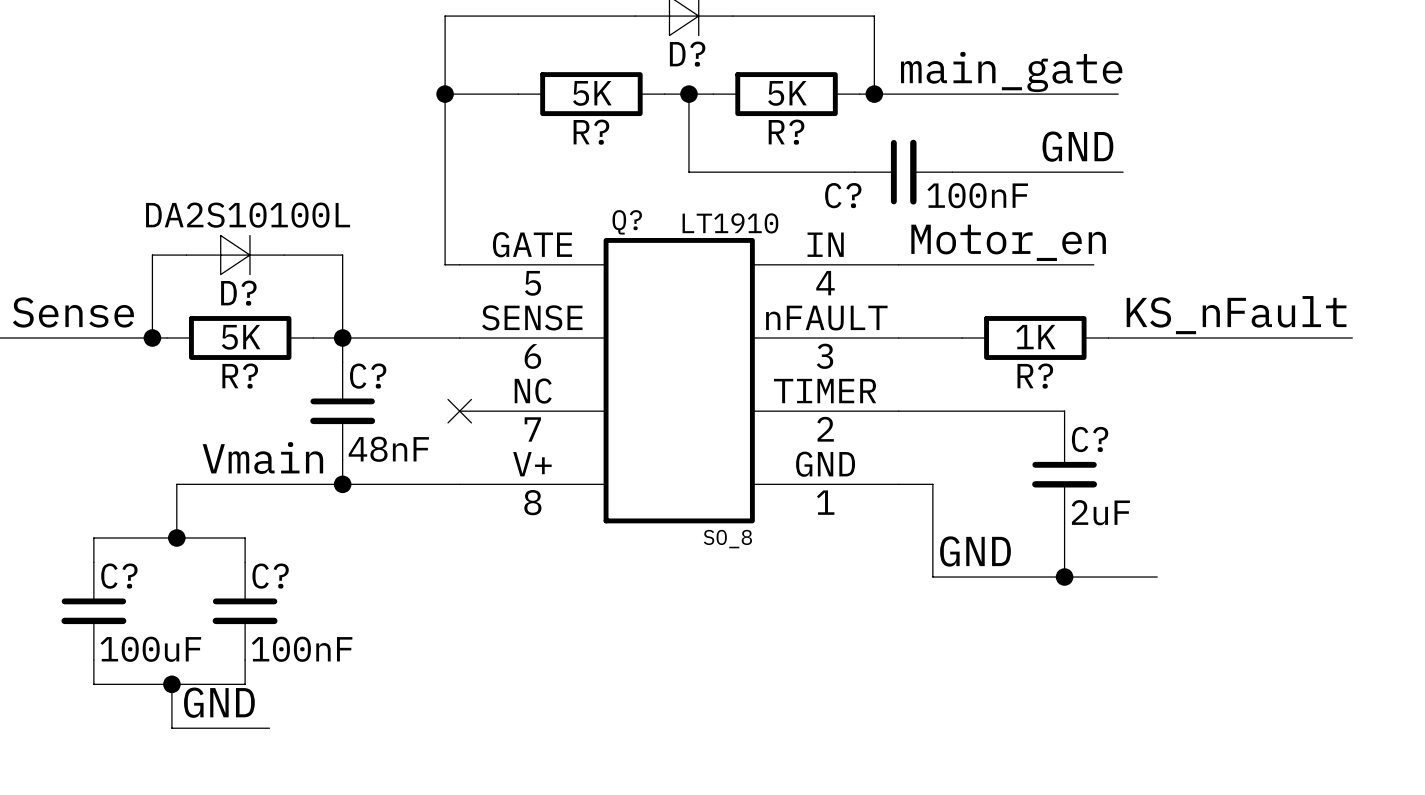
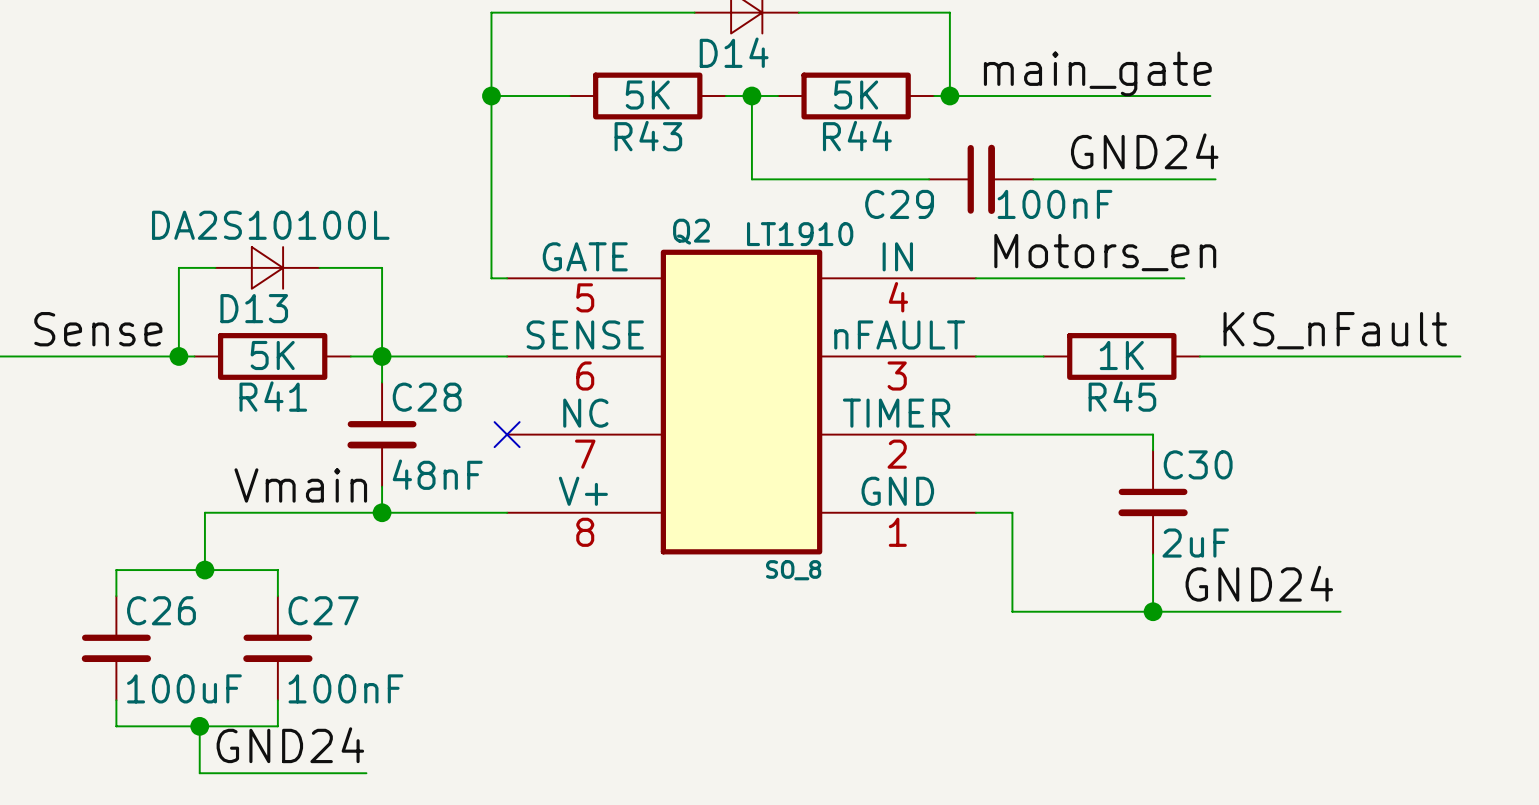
D? name: D? (687, 54) -> D14 (734, 52)
R? name: R? (591, 132) -> R43 (648, 136)
R? name: R? (786, 132) -> R44 (857, 136)
label: GND (1077, 146) -> GND24 (1144, 151)
C? name: C? (843, 195) -> C29 (899, 204)
Q? name: Q? (627, 222) -> Q2 (691, 231)
label: Motor_en (1008, 242) -> Motors_en (1105, 252)
D? name: D? (238, 293) -> D13 (254, 308)
R? name: R? (240, 376) -> R41 (273, 396)
C? name: C? (368, 376) -> C28 (427, 397)
R? name: R? (1035, 376) -> R45 (1122, 396)
C? name: C? (1090, 439) -> C30 (1198, 464)
label: GND (975, 551) -> none
label: none -> GND24 (1259, 583)
C? name: C? (119, 576) -> C26 (161, 610)
C? name: C? (270, 576) -> C27 (323, 610)
wire: none -> (1252, 611) (1340, 611)
label: GND (219, 702) -> GND24 (290, 745)
wire: none -> (303, 773) (366, 773)

